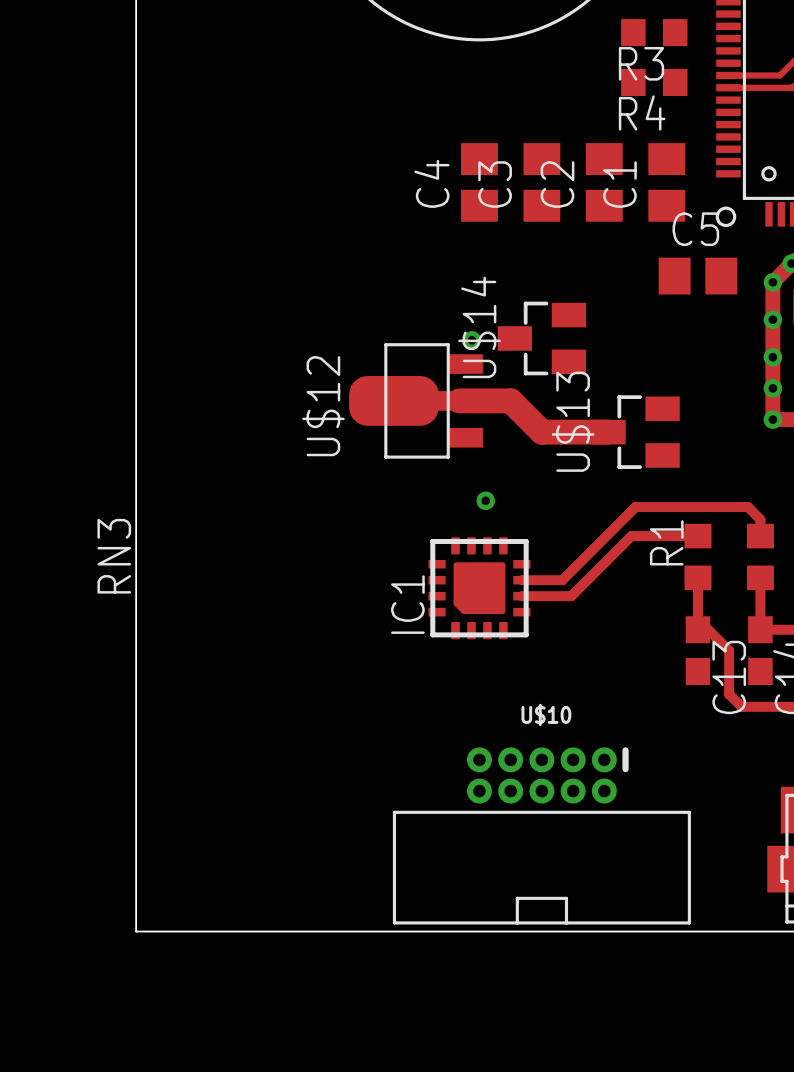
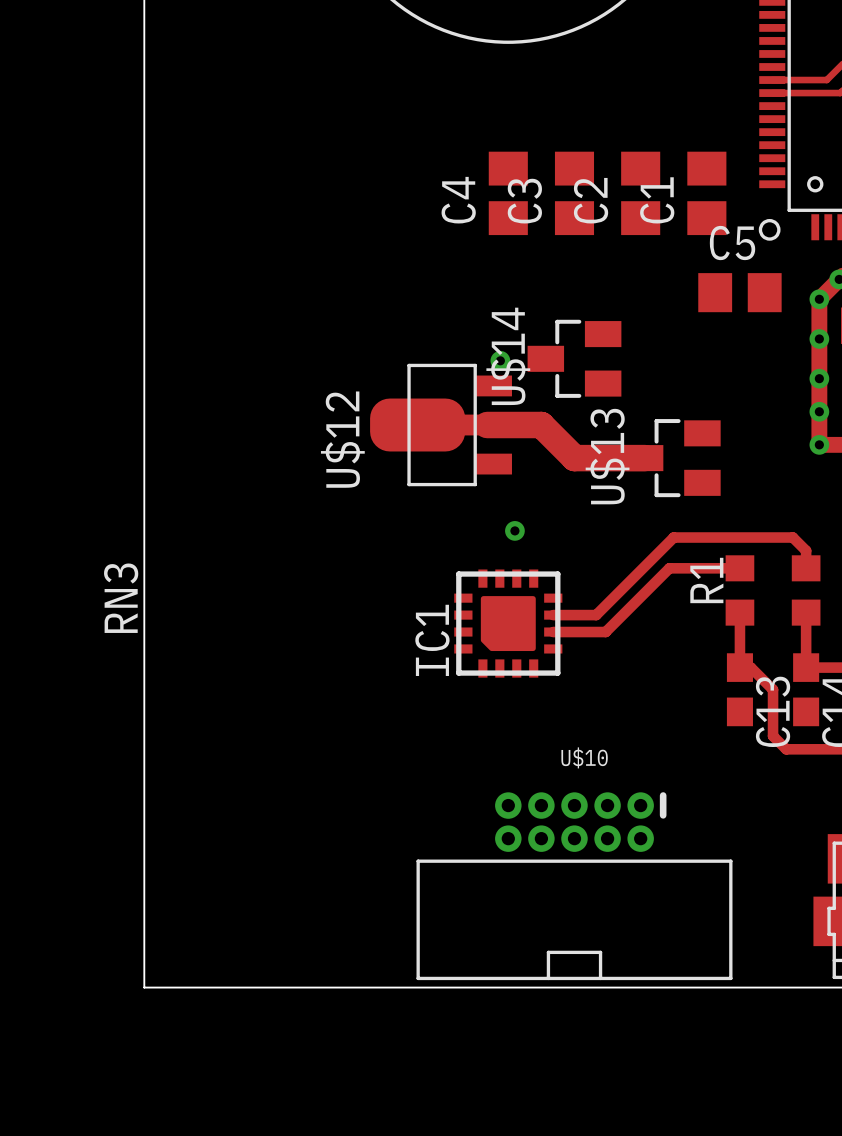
R3: (654, 32) -> none
R4: (654, 82) -> none

